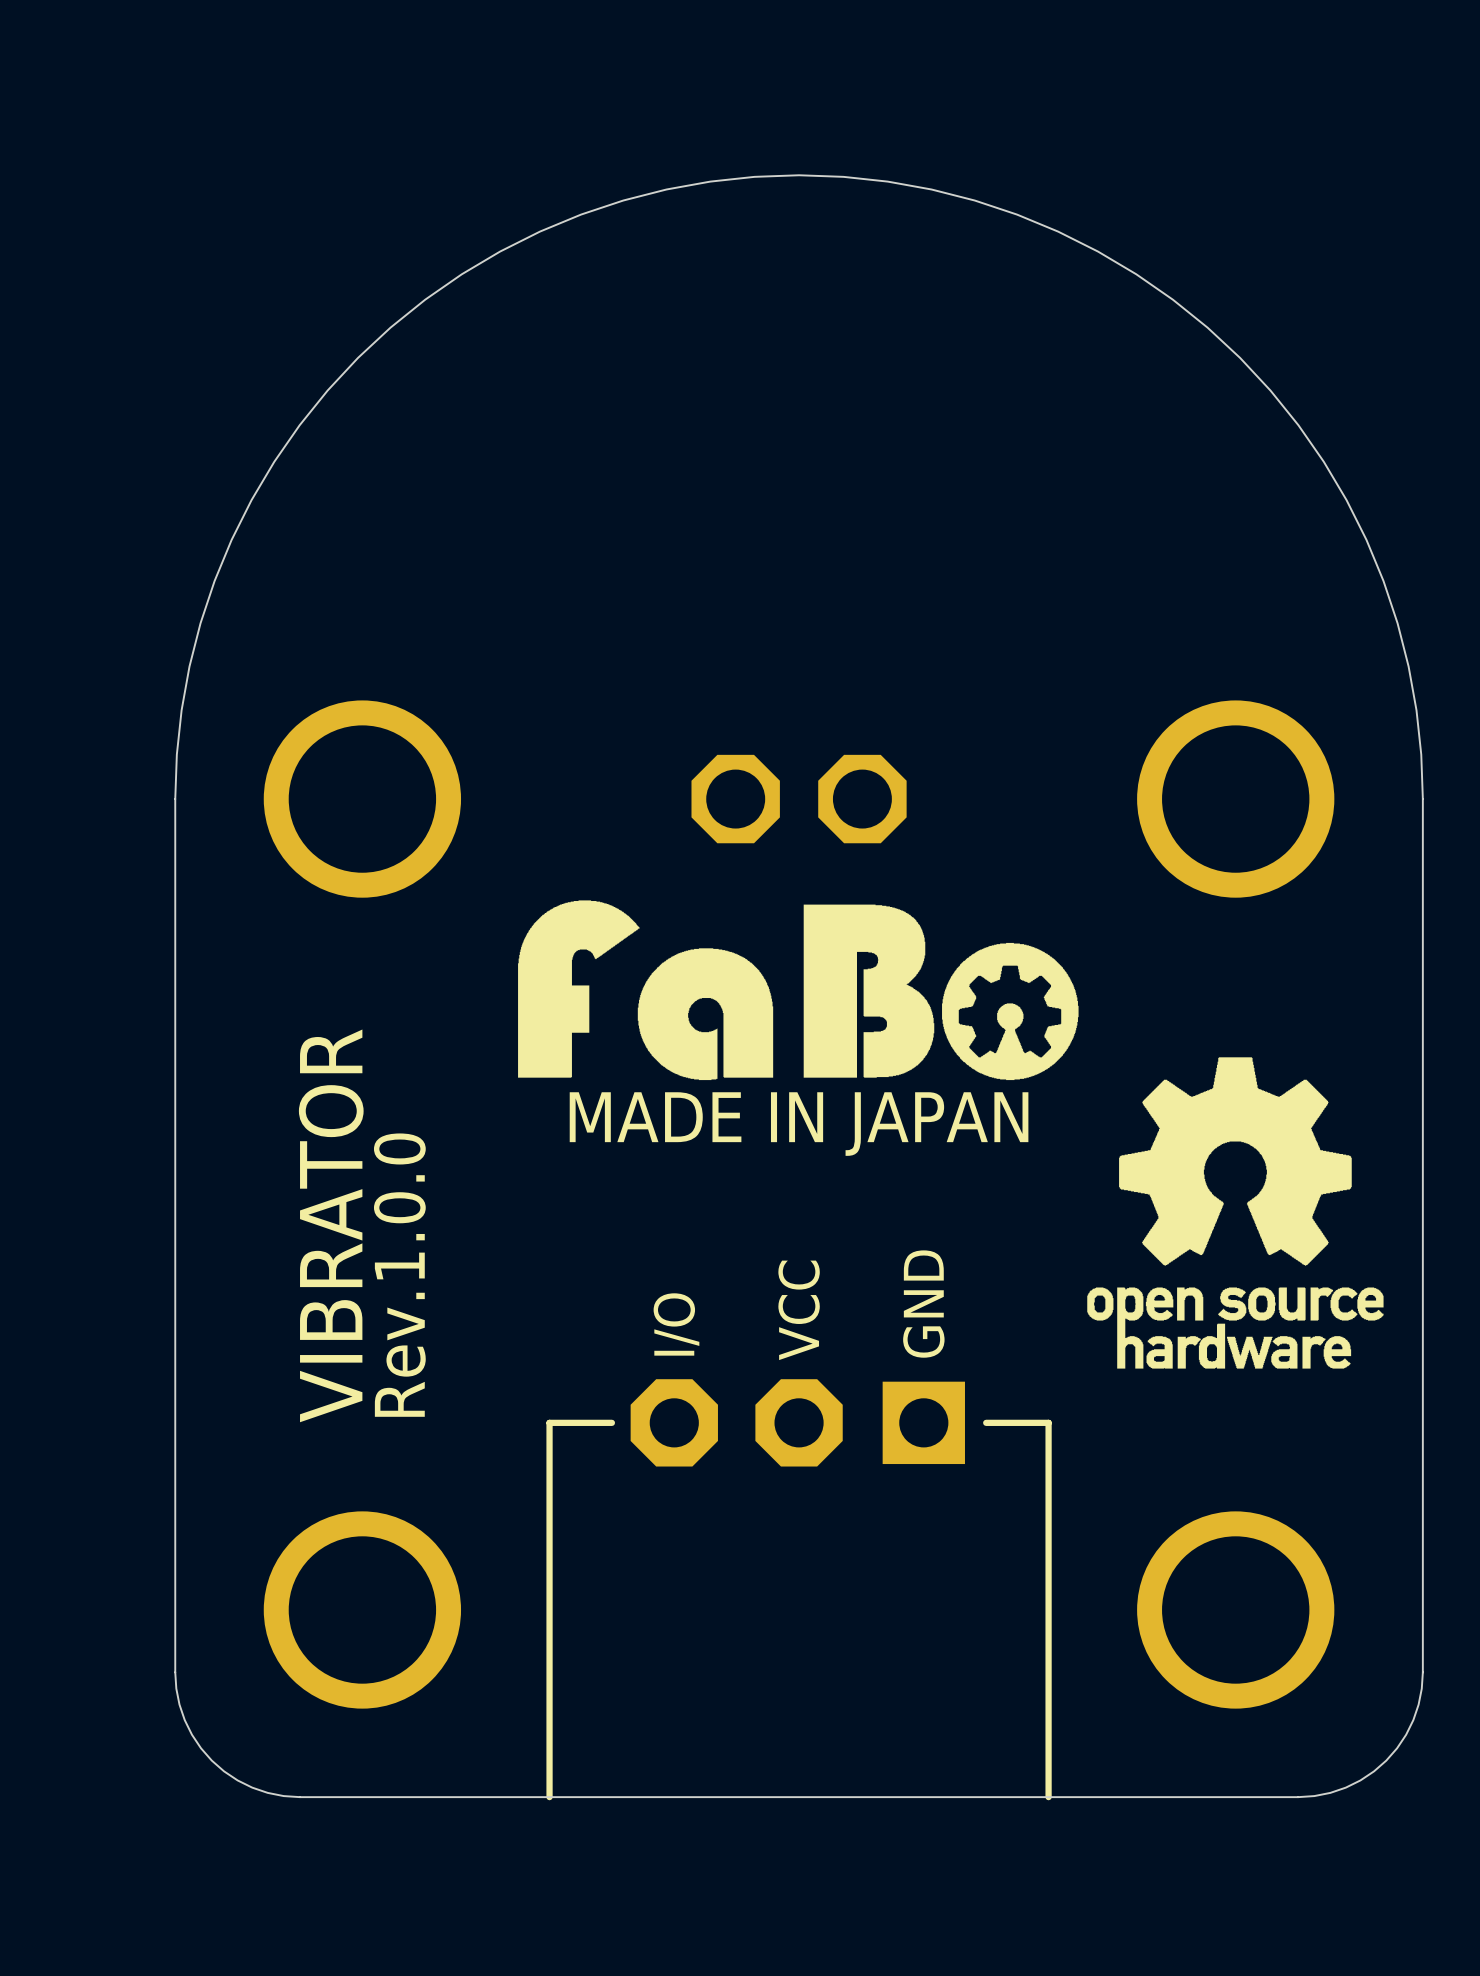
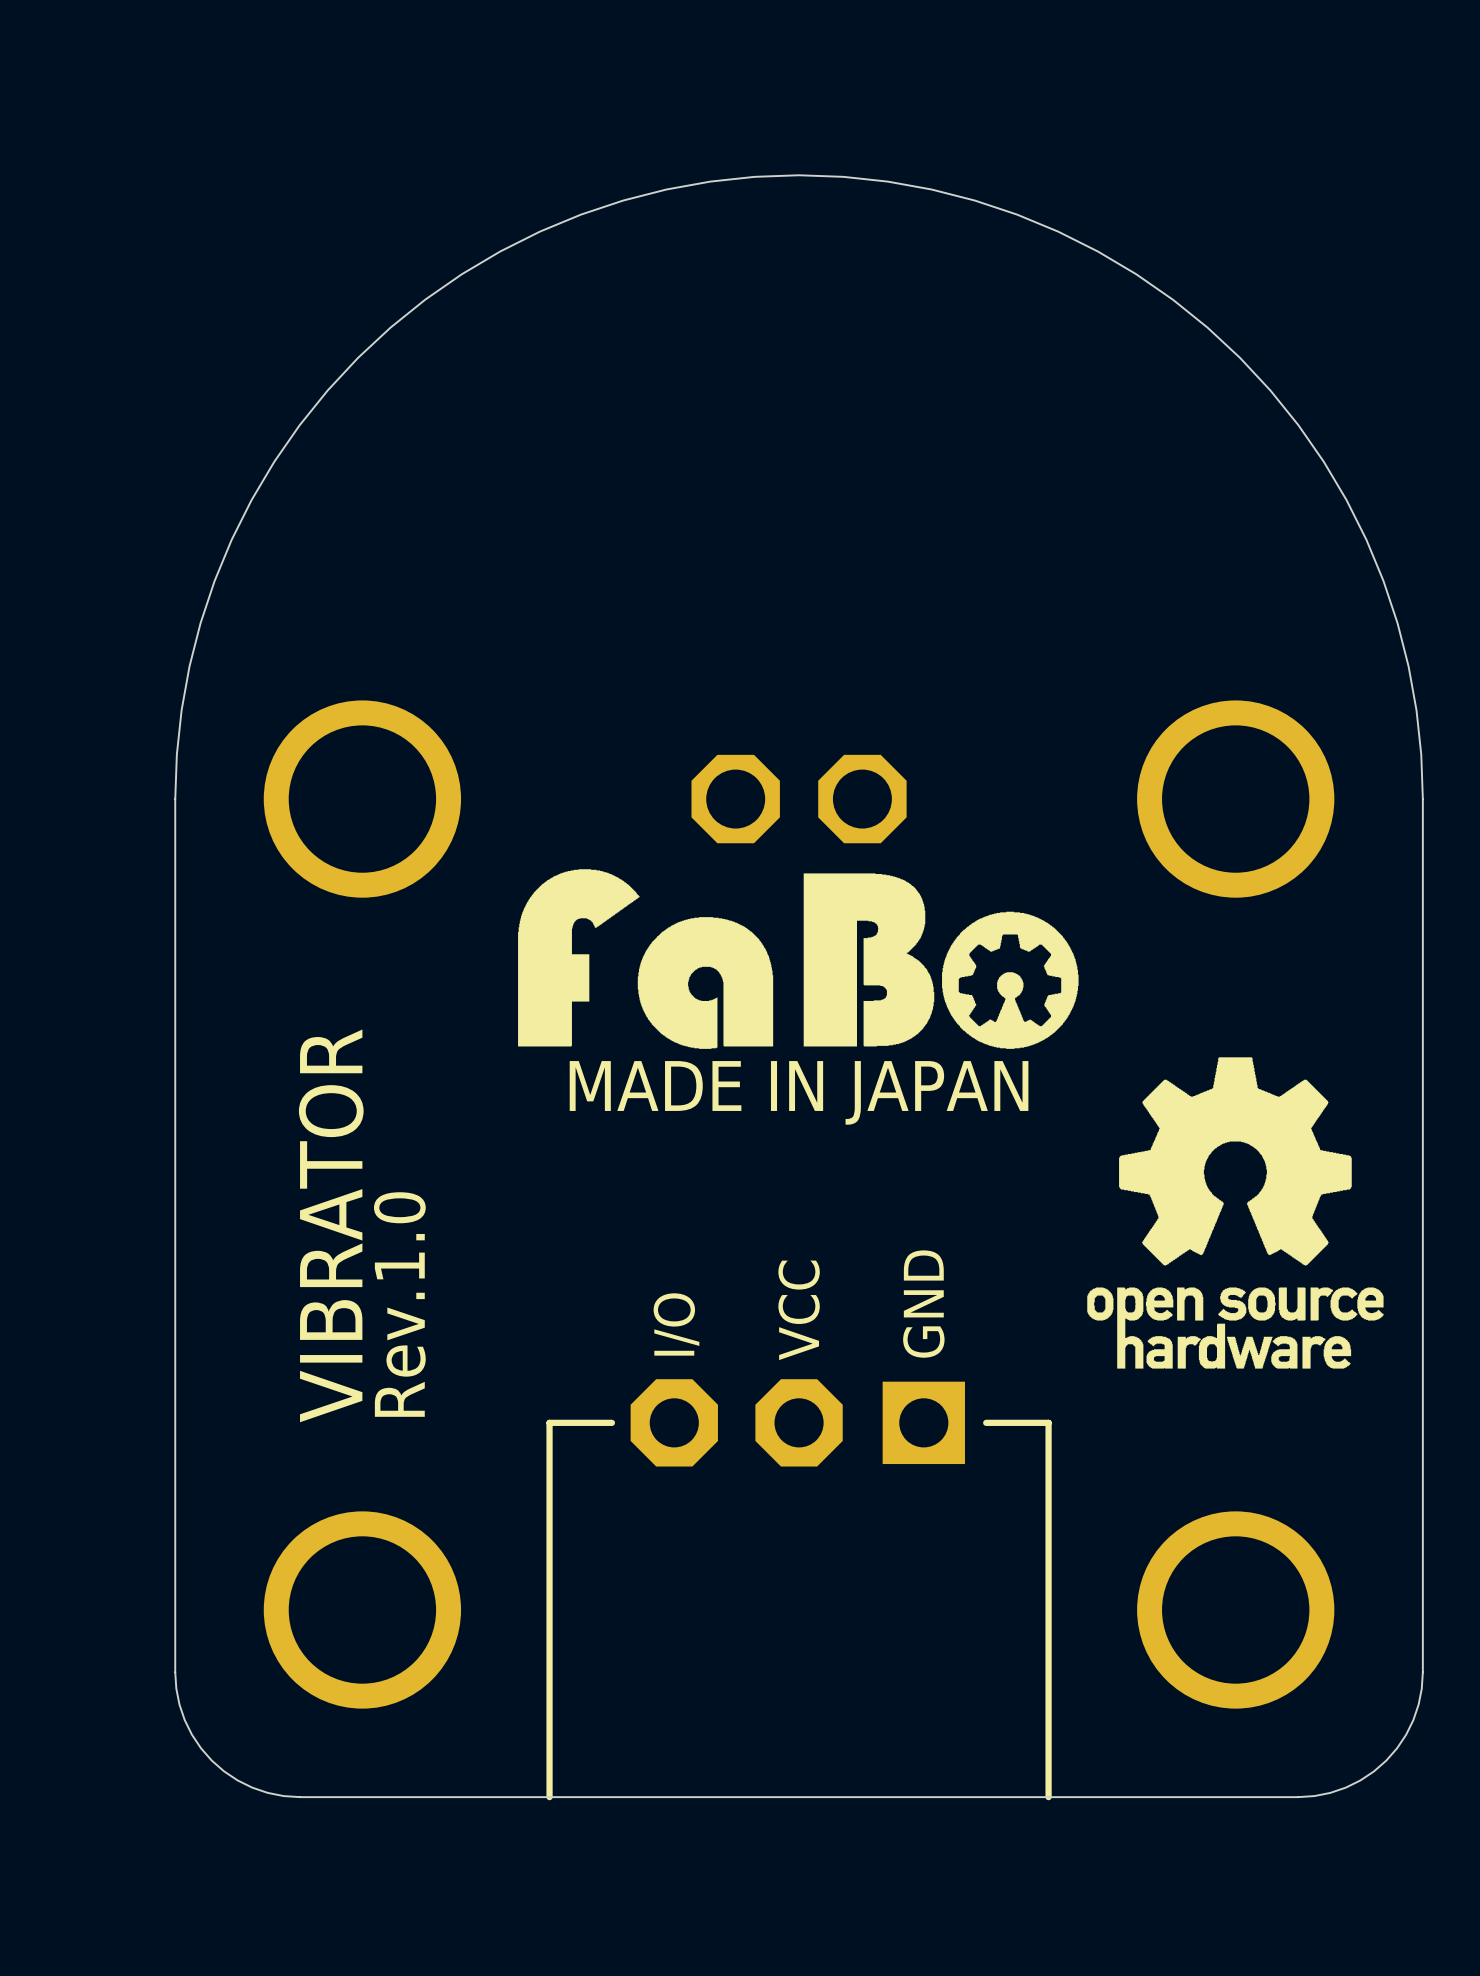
drawing position: (798, 990) -> (798, 959)
text position: MADE IN JAPAN (799, 1124) -> MADE IN JAPAN (799, 1092)
text: Rev.1.0.0 (399, 1275) -> Rev.1.0 (399, 1304)

